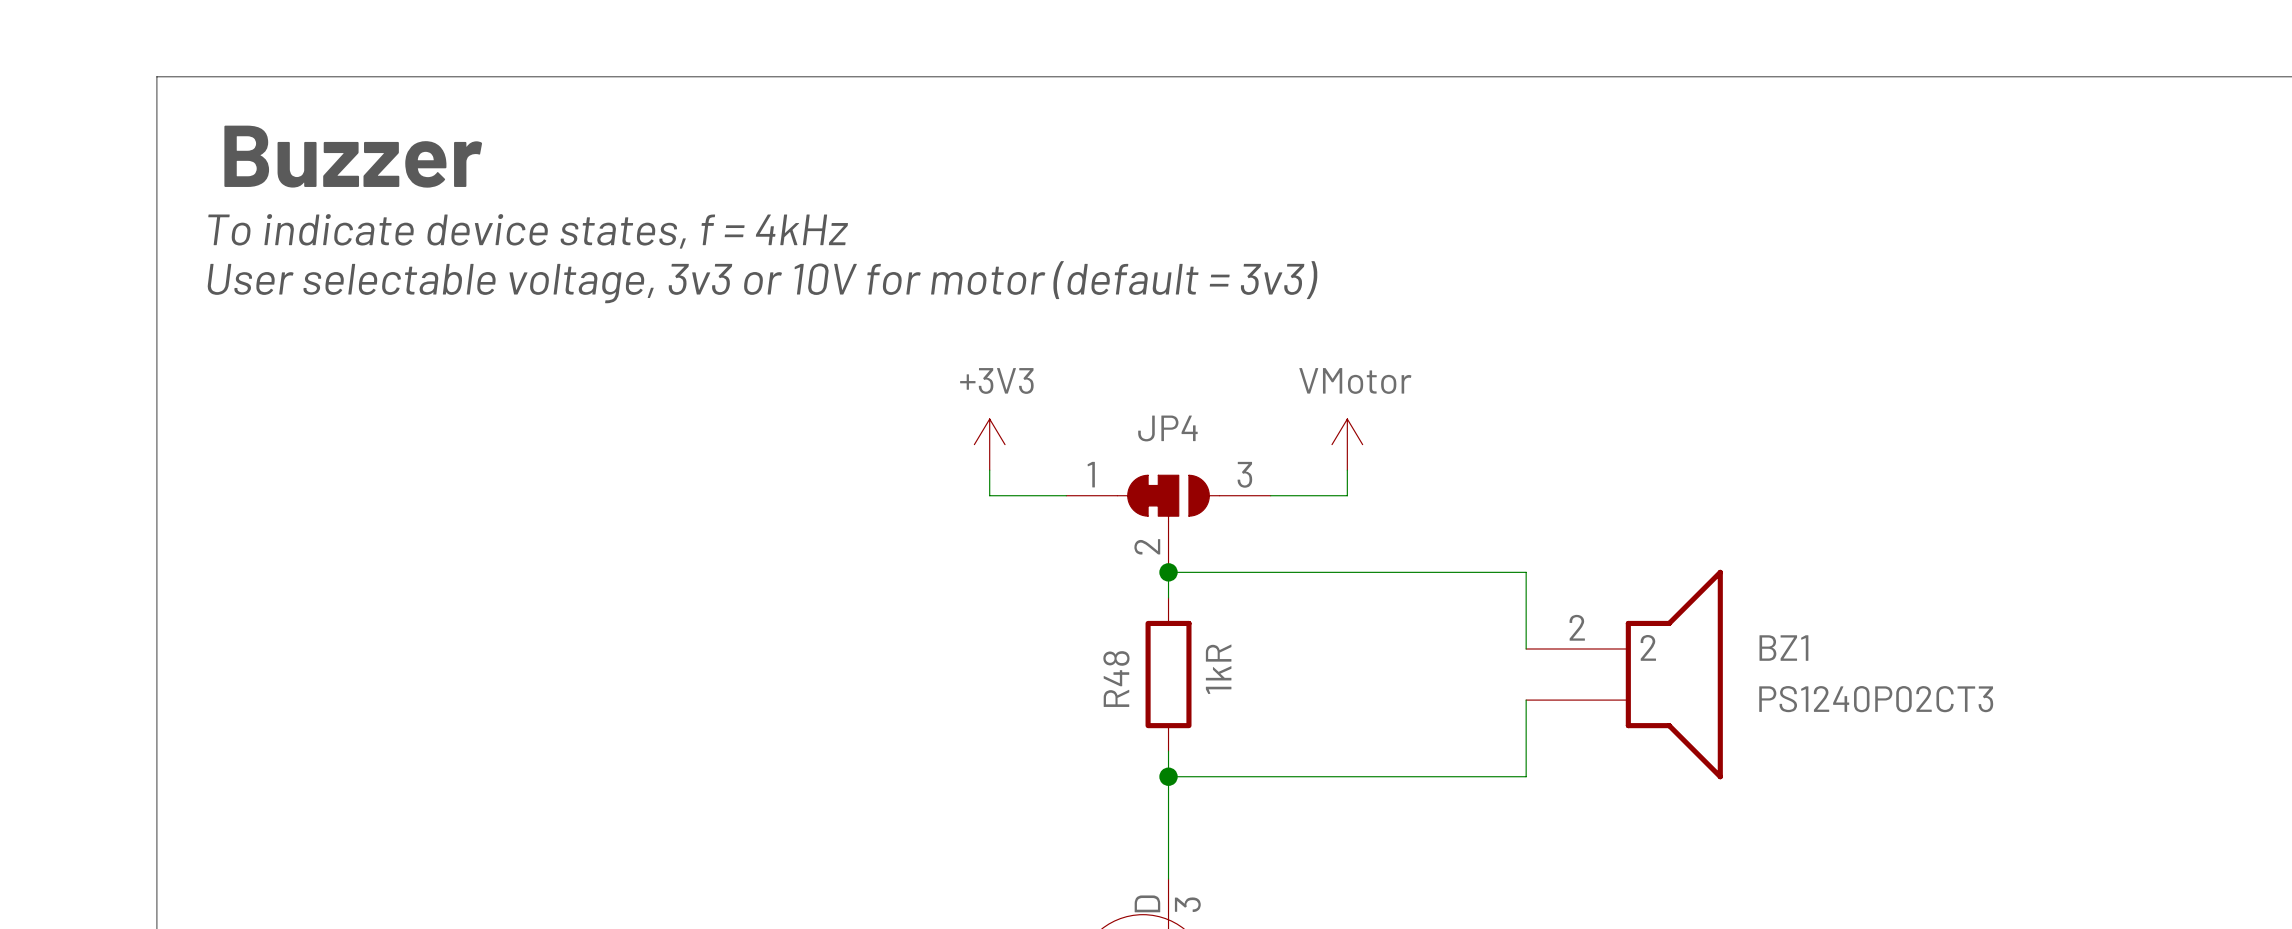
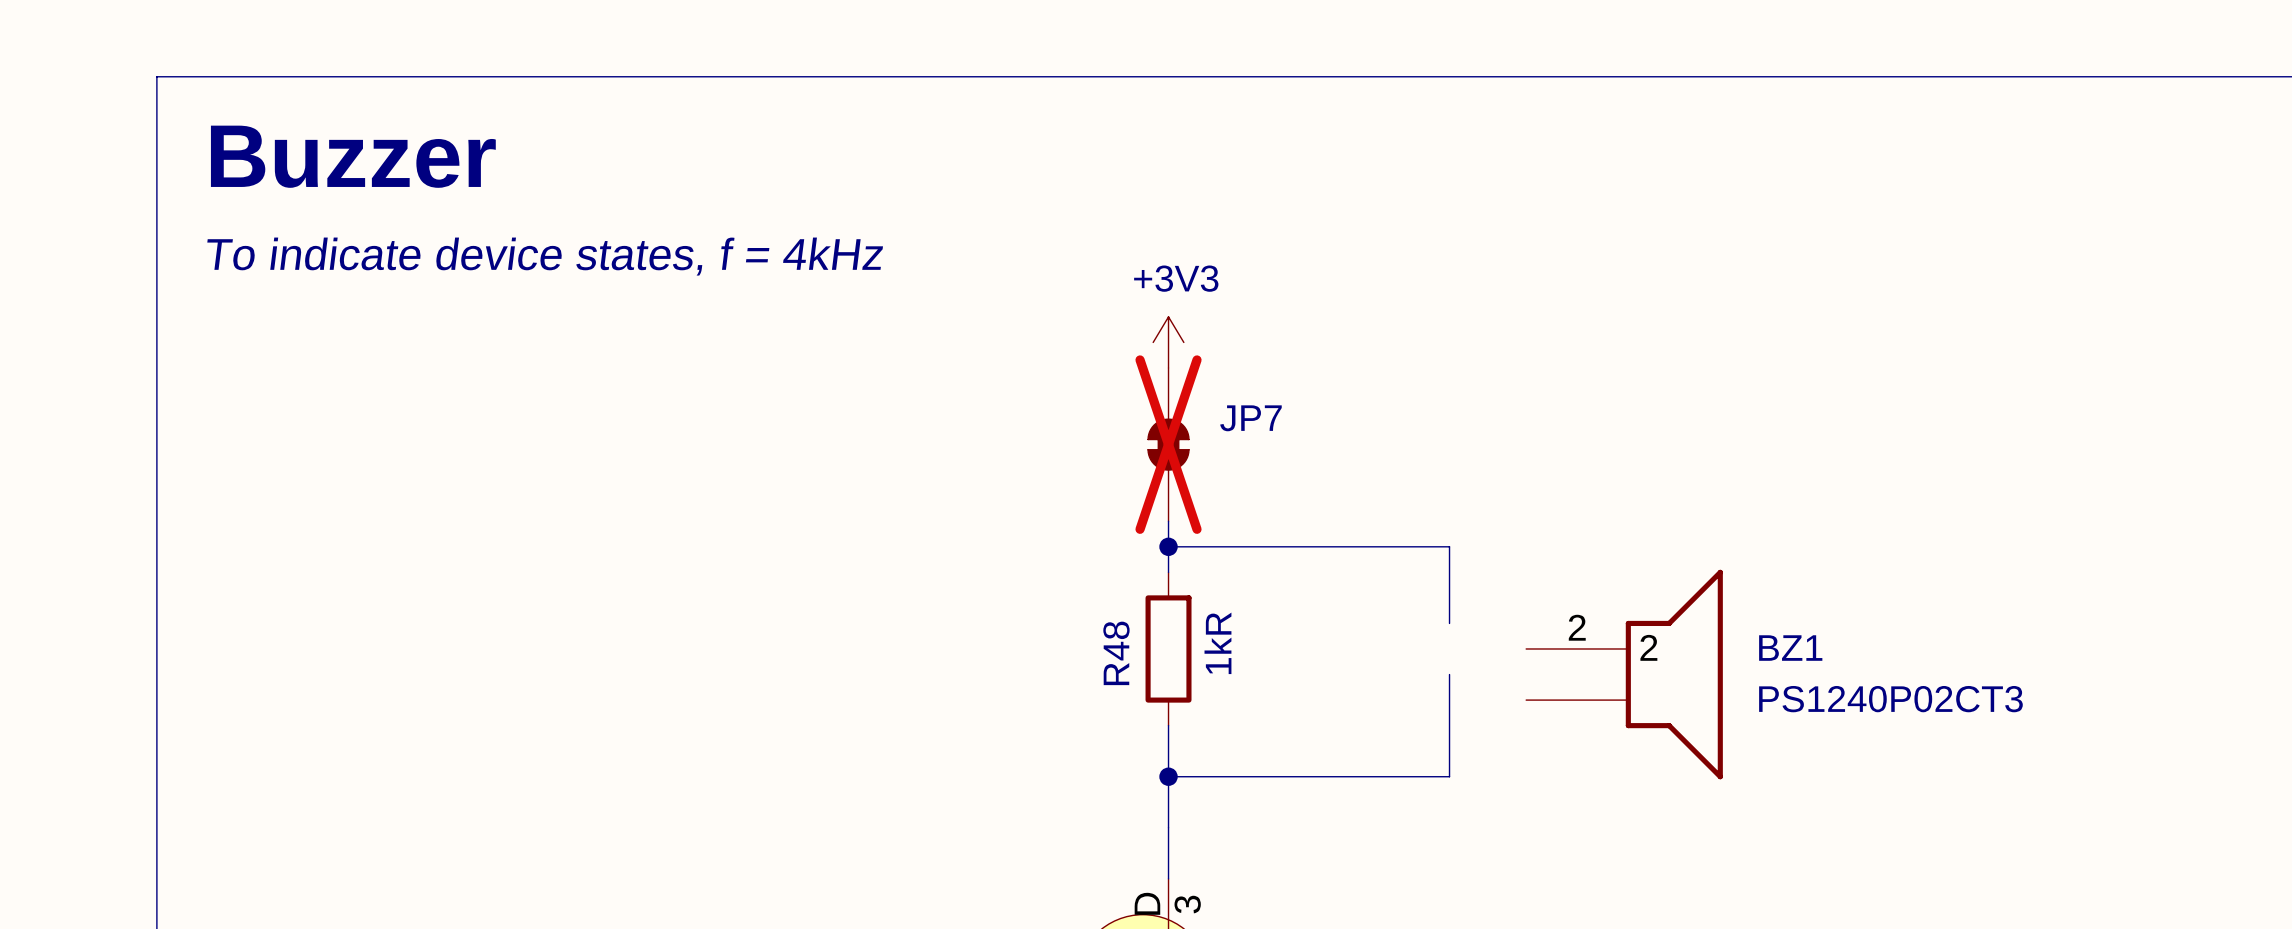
text position: To indicate device states, f = 4kHz (528, 231) -> To indicate device states, f = 4kHz (545, 256)
text: User selectable voltage, 3v3 or 10V for motor (default = 3v3) (762, 282) -> none
power symbol position: +3V3 (989, 444) -> +3V3 (1168, 342)
JP7: none -> (1168, 444)
power symbol: VMotor (1347, 444) -> none
wire: (989, 470) (989, 495) (1066, 495) -> none
wire: (1347, 470) (1347, 495) (1270, 495) -> none
JP4: (1168, 523) -> none
wire: none -> (1168, 546) (1449, 546) (1449, 623)
junction position: (1168, 572) -> (1168, 546)
wire: (1168, 597) (1168, 572) (1526, 572) (1526, 648) -> none
R48 position: (1168, 674) -> (1168, 648)
wire: (1526, 700) (1526, 776) (1449, 776) -> (1449, 674) (1449, 776)

